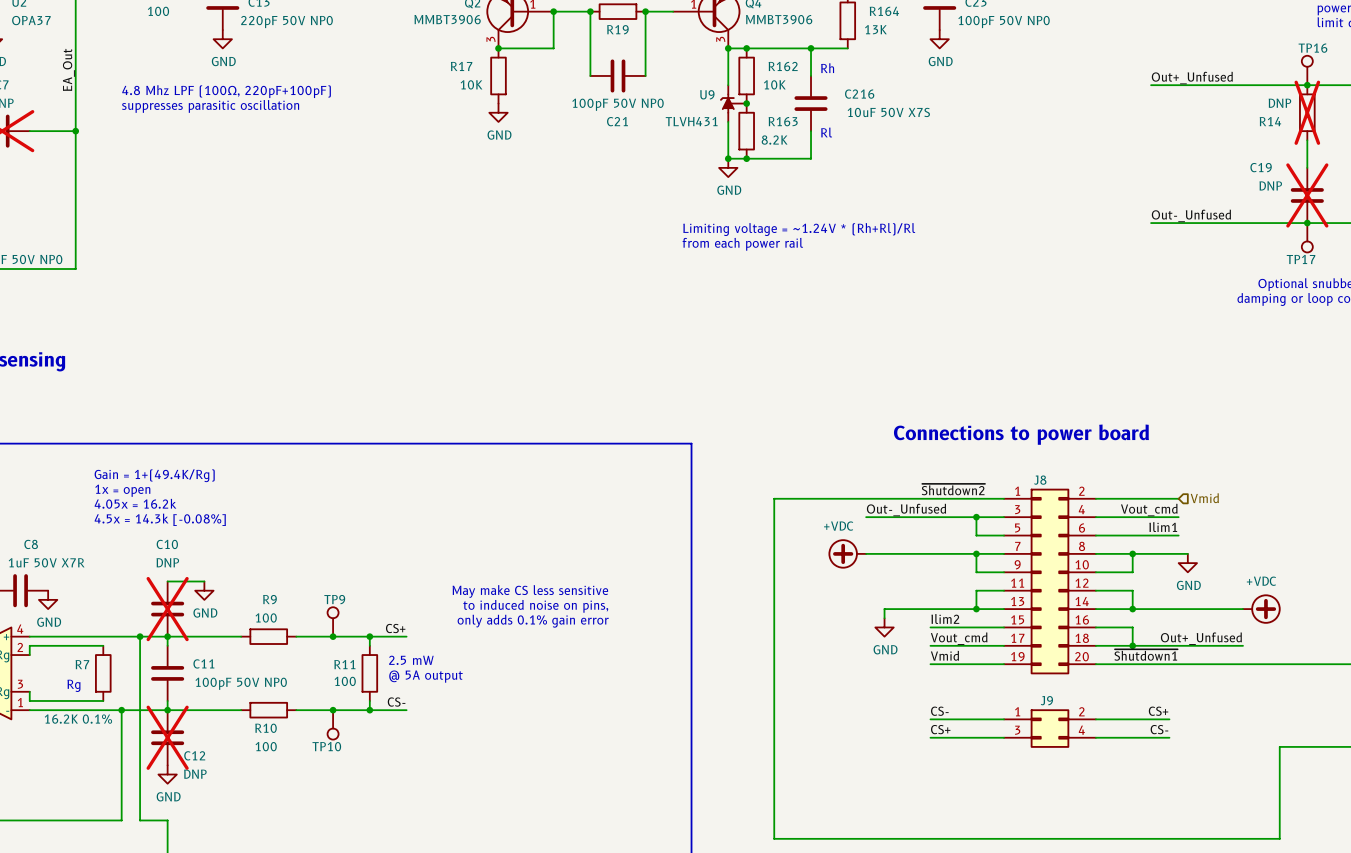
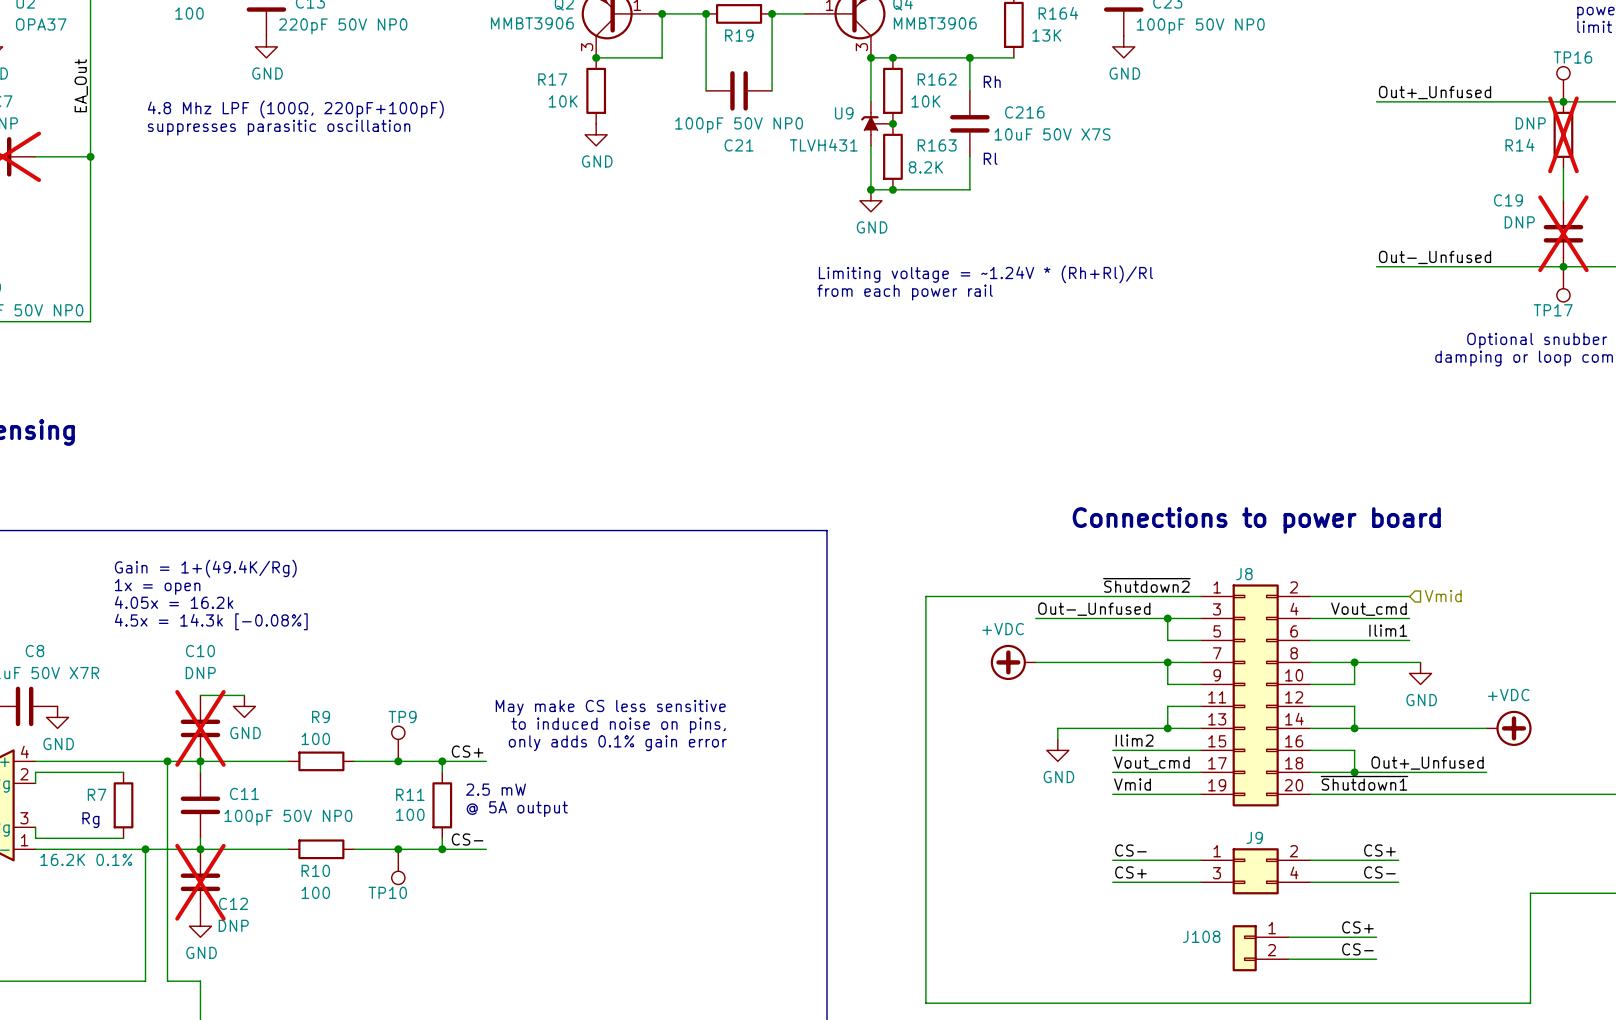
label: none -> CS+ (1357, 927)
wire: none -> (1288, 937) (1376, 937)
J108: none -> (1260, 948)
label: none -> CS- (1357, 949)
wire: none -> (1288, 959) (1376, 959)

